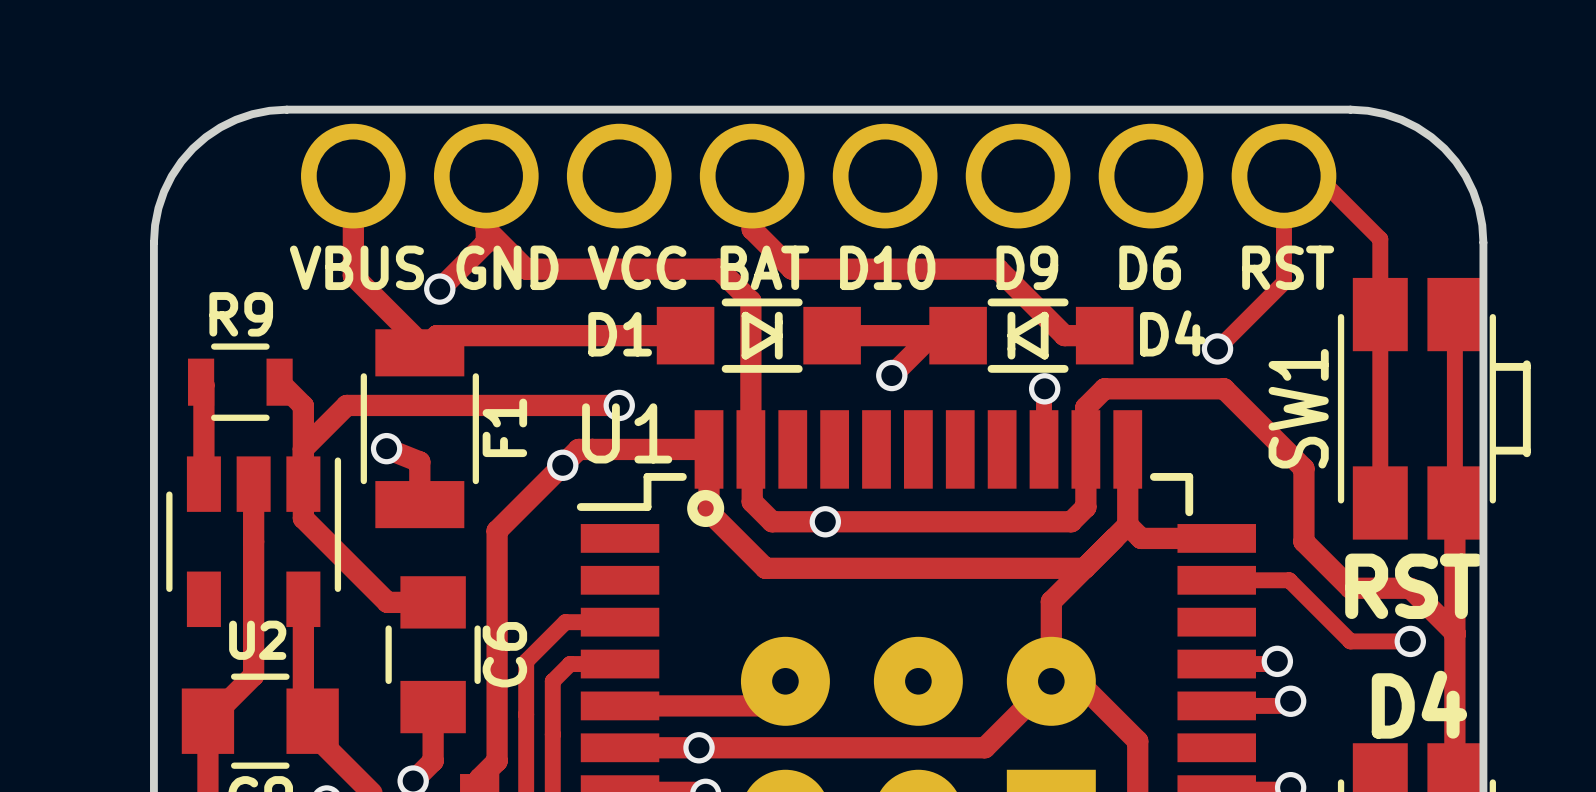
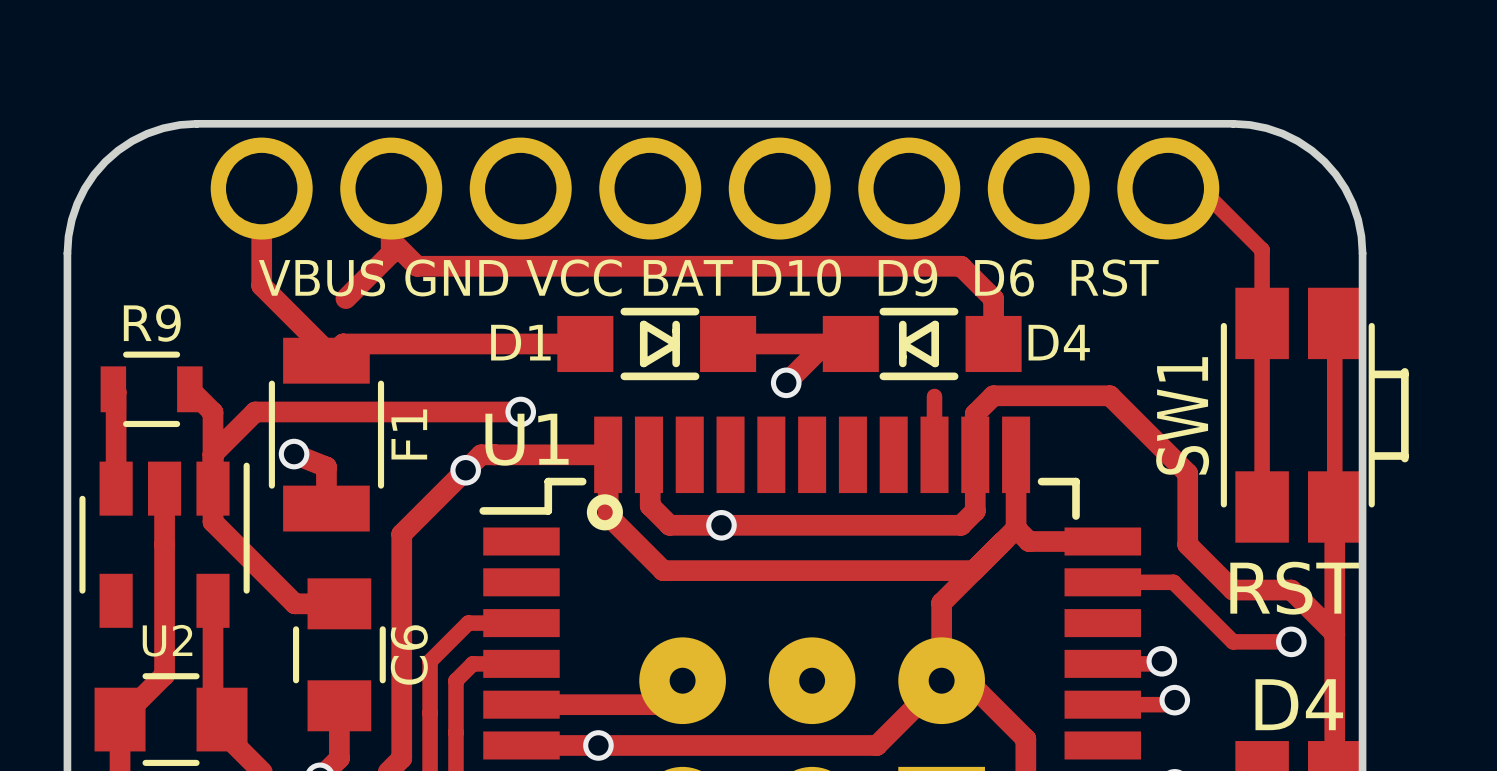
track: (752, 176) (752, 229) (792, 269) (998, 269) (1064, 335) (1104, 335) -> (417, 266) (961, 266) (993, 298) (993, 343)
track: (1283, 176) (1283, 282) (1217, 348) -> none
track: (512, 255) (526, 269) (718, 269) (750, 301) (750, 449) -> none
via: (439, 289) -> none
via: (1217, 348) -> none
via: (1044, 388) -> none

